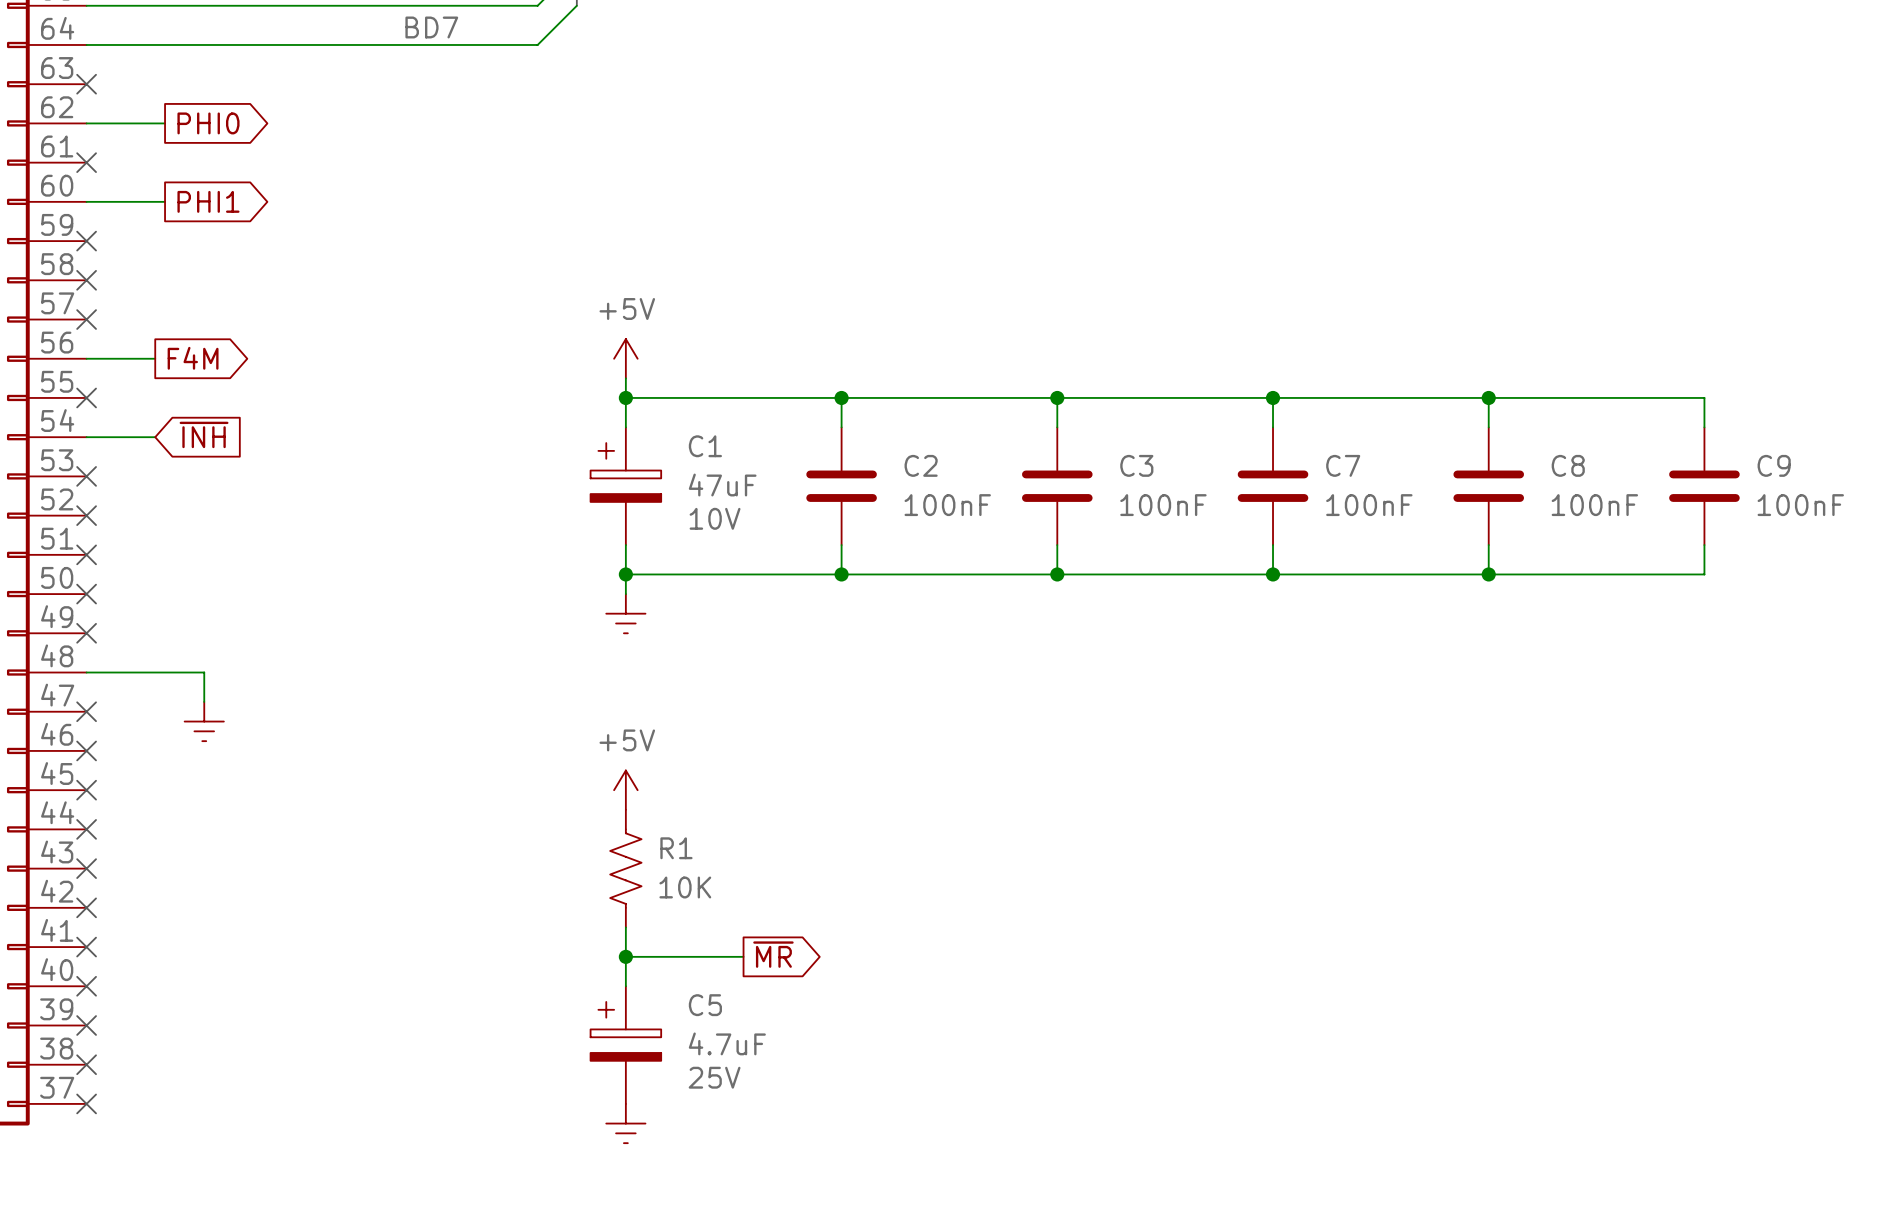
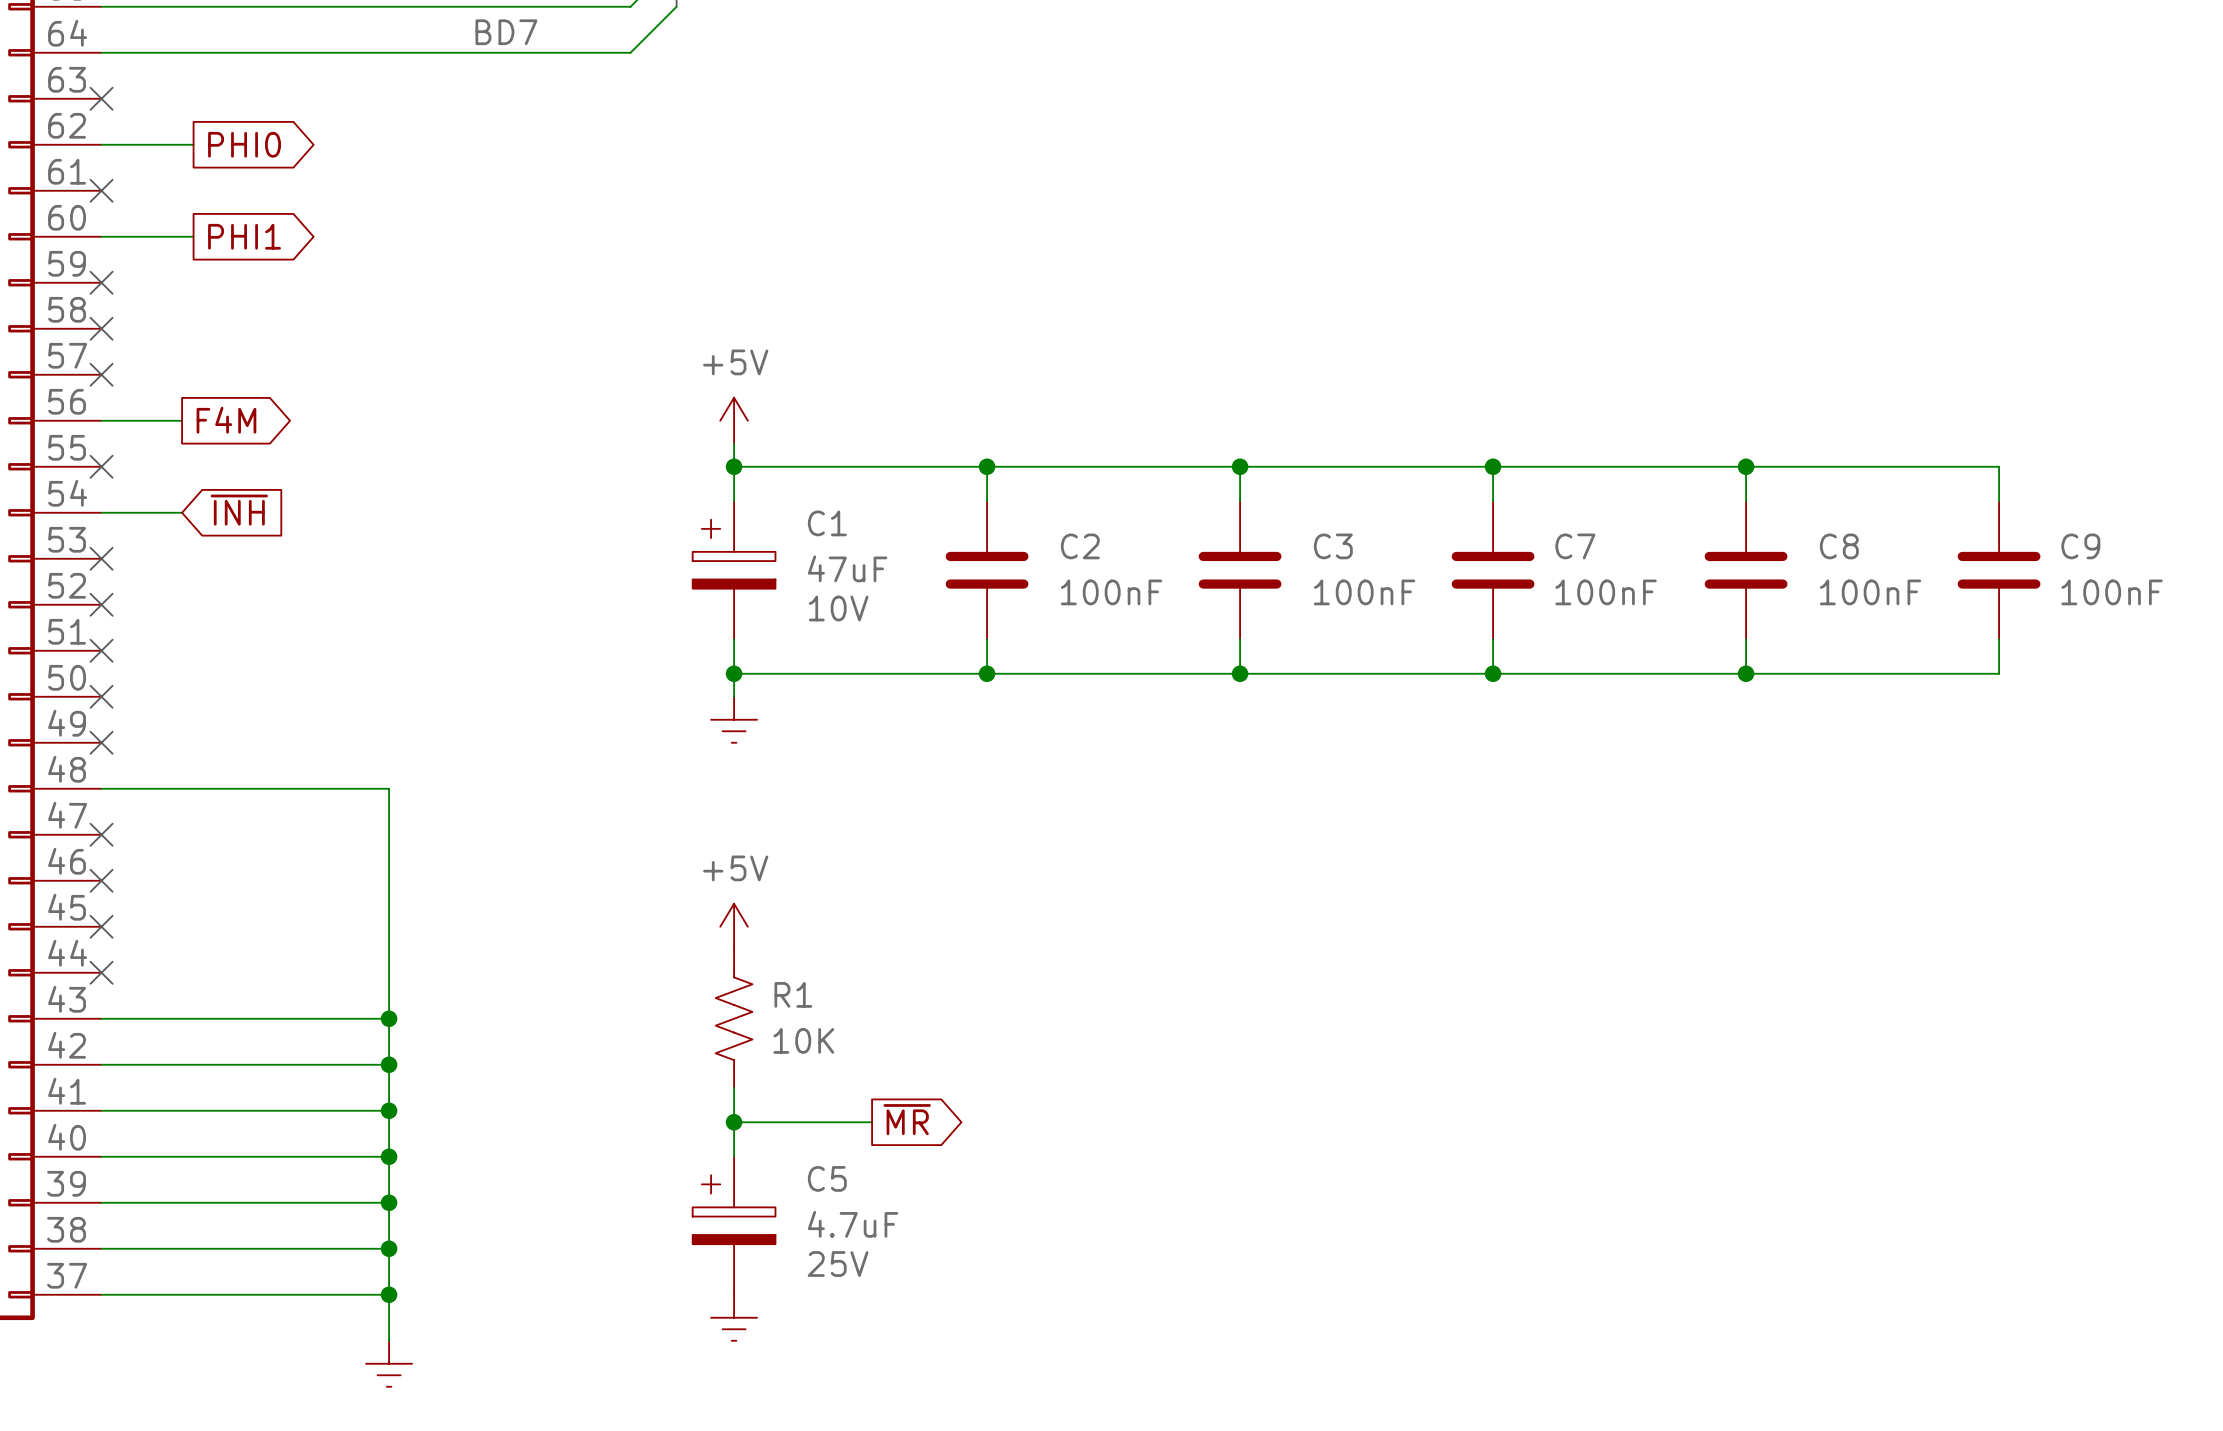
wire: (204, 672) (204, 701) -> (239, 788) (389, 788) (389, 1340)
power symbol: (204, 721) -> none
wire: none -> (101, 1018) (389, 1018)
no-connect mark: (86, 868) -> none
junction: none -> (389, 1018)
wire: none -> (101, 1064) (389, 1064)
no-connect mark: (86, 907) -> none
junction: none -> (389, 1064)
wire: none -> (101, 1110) (389, 1110)
no-connect mark: (86, 947) -> none
junction: none -> (389, 1110)
wire: none -> (101, 1156) (389, 1156)
no-connect mark: (86, 986) -> none
junction: none -> (389, 1156)
wire: none -> (101, 1202) (389, 1202)
no-connect mark: (86, 1025) -> none
junction: none -> (389, 1202)
wire: none -> (101, 1248) (389, 1248)
no-connect mark: (86, 1064) -> none
junction: none -> (389, 1248)
wire: none -> (101, 1294) (389, 1294)
no-connect mark: (86, 1103) -> none
junction: none -> (389, 1294)
power symbol: none -> (389, 1363)

